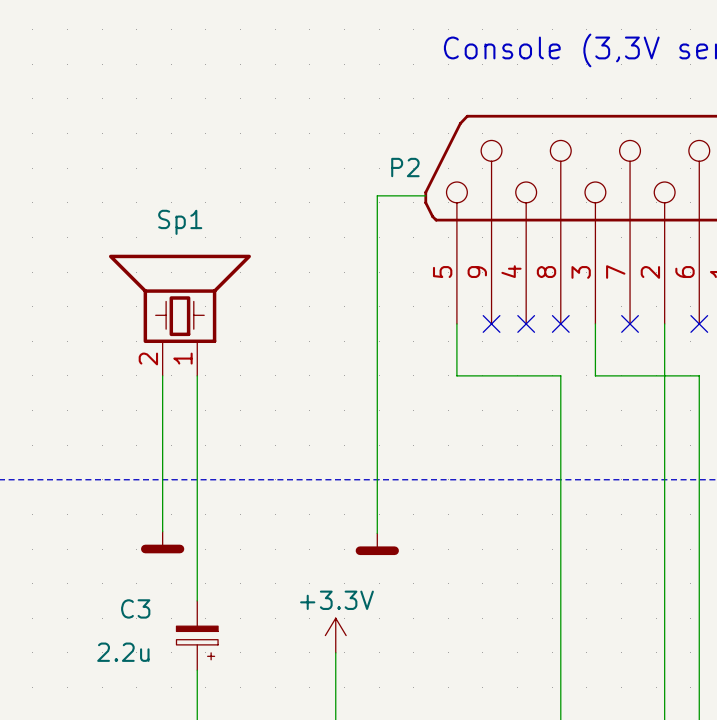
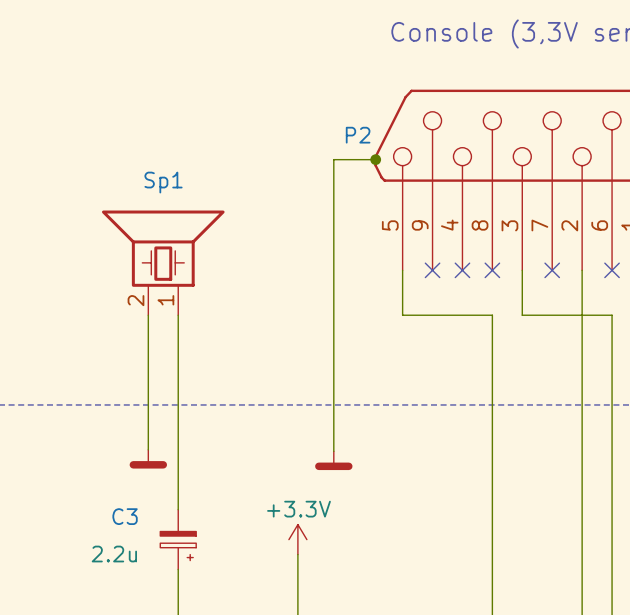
junction: none -> (375, 159)

